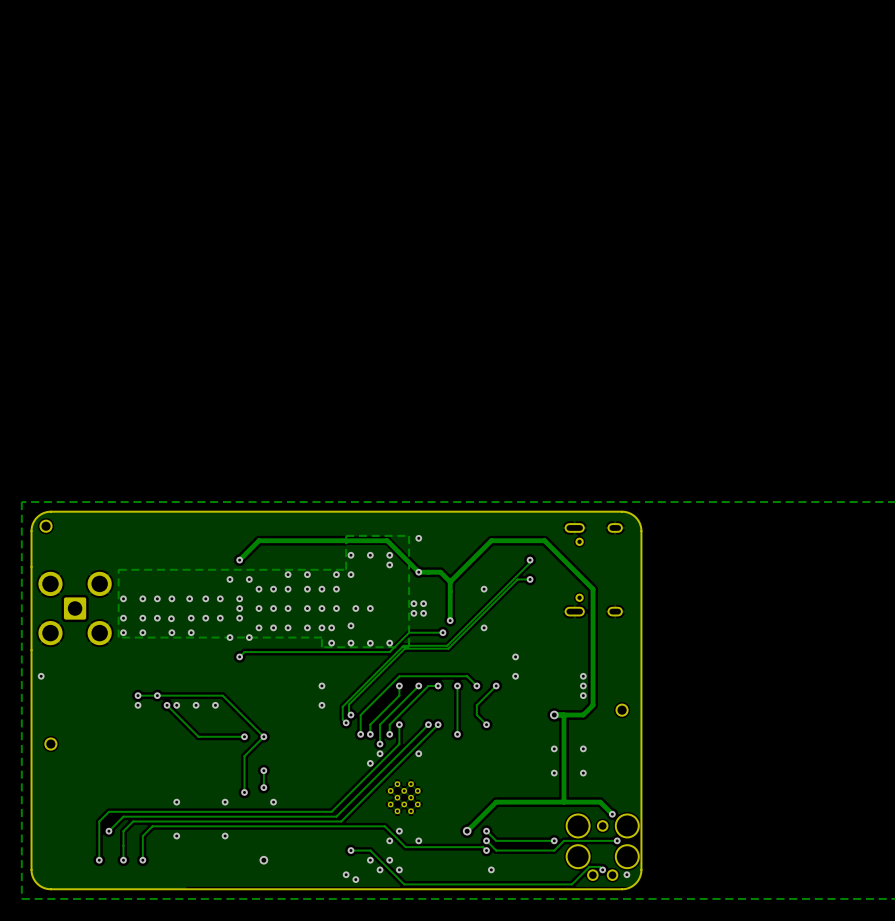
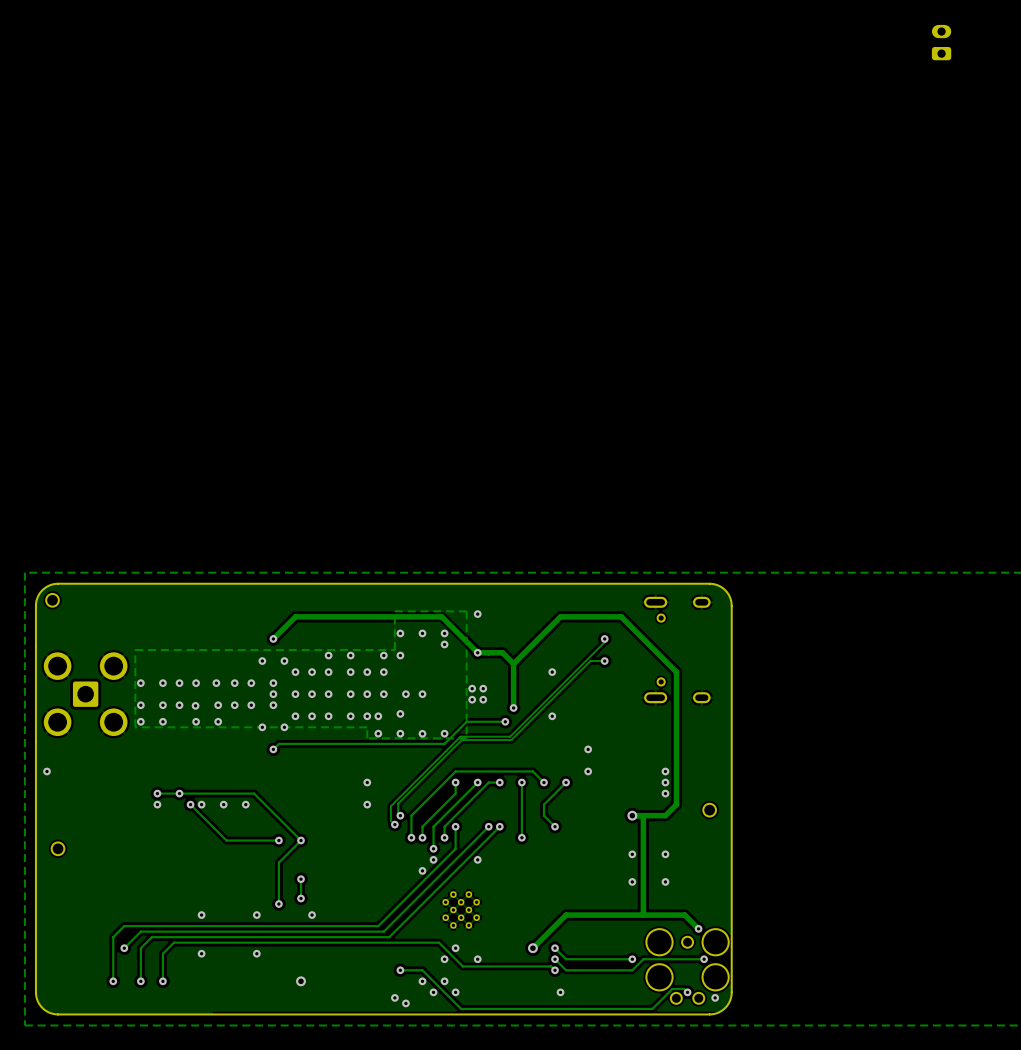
part: none -> (941, 42)

